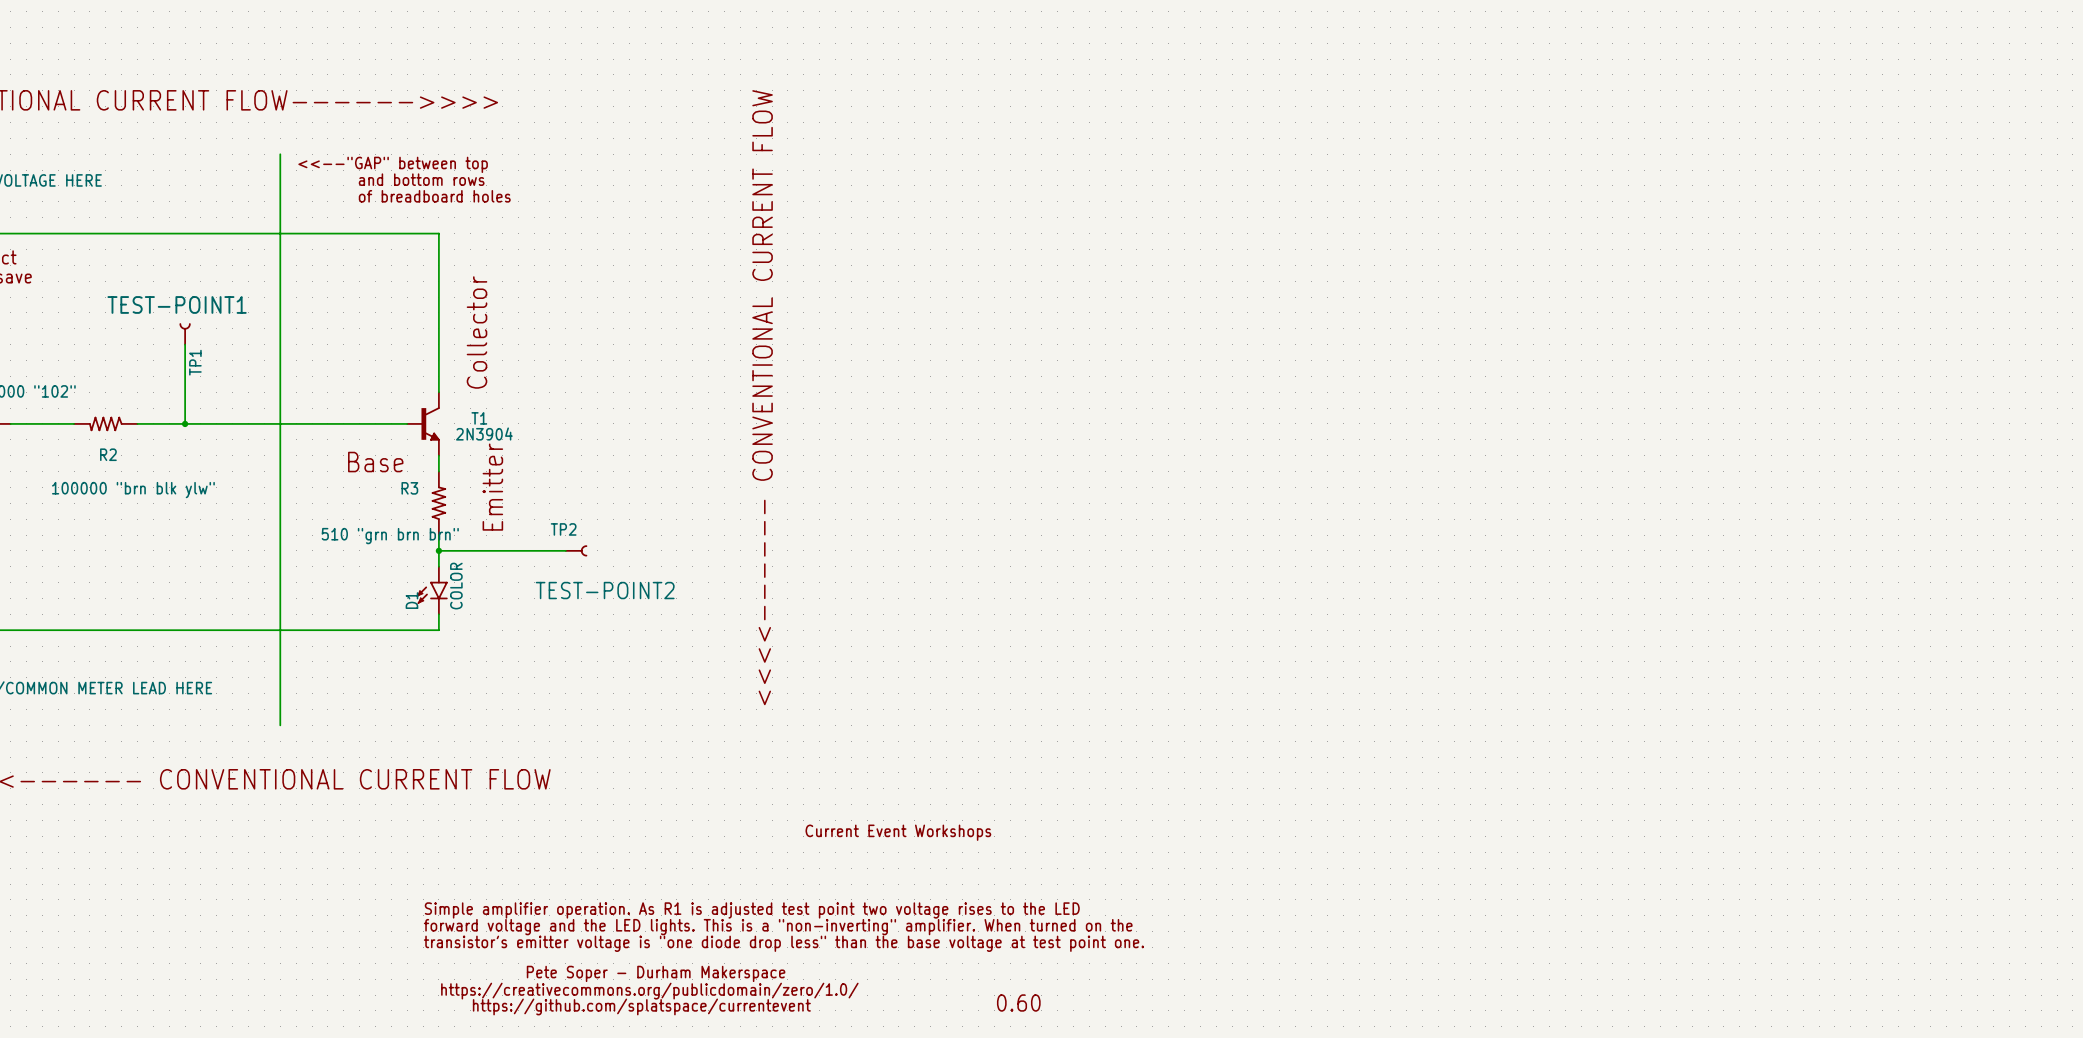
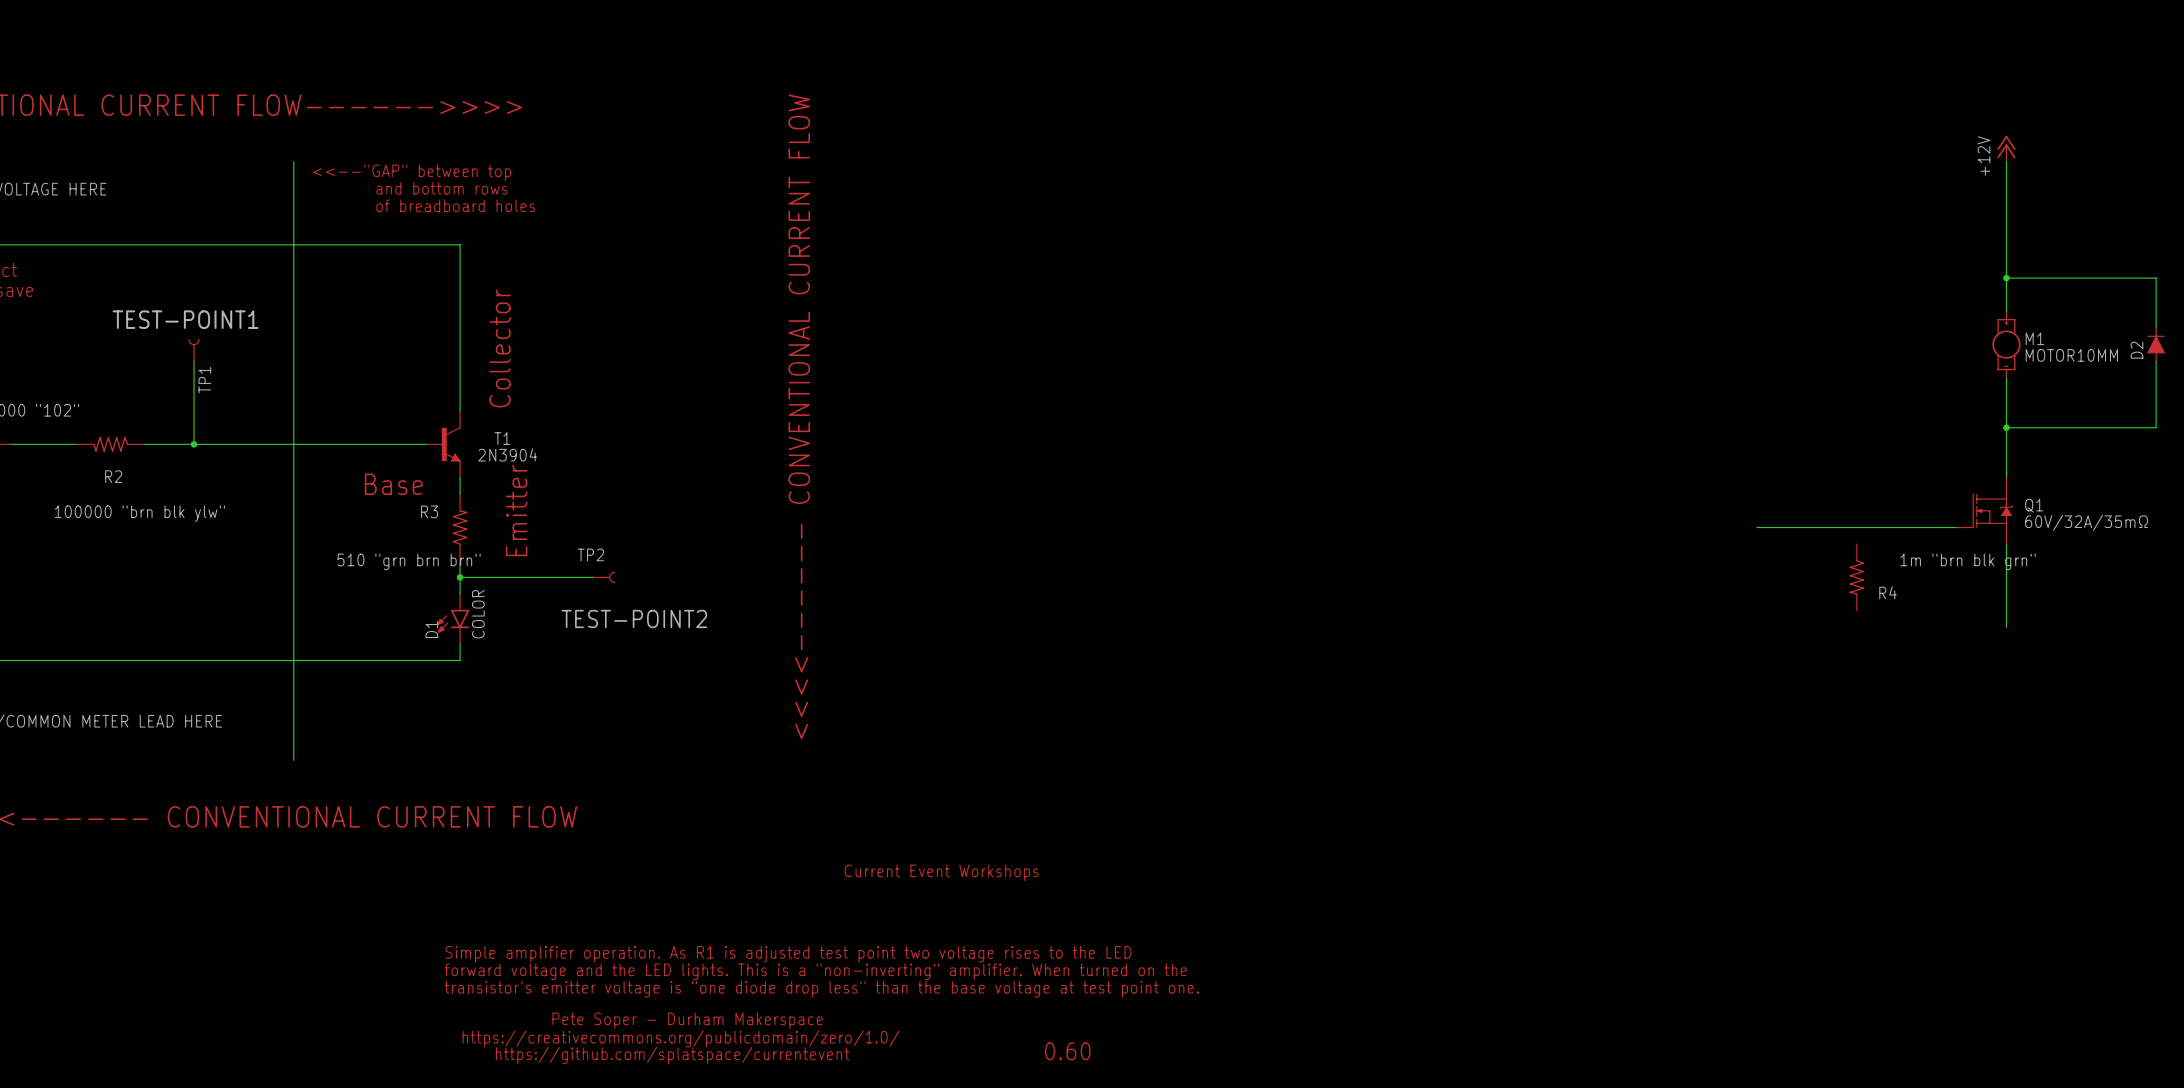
power symbol: none -> +12V (2006, 148)
wire: none -> (2006, 161) (2006, 311)
wire: none -> (2006, 278) (2156, 278) (2156, 327)
junction: none -> (2006, 278)
M1: none -> MOTOR10MM (2006, 344)
D2: none -> (2156, 344)
wire: none -> (2156, 361) (2156, 427) (2006, 427)
wire: none -> (2006, 377) (2006, 477)
junction: none -> (2006, 427)
Q1: none -> 60V/32A/35mΩ (1984, 510)
wire: none -> (1757, 527) (1956, 527)
wire: none -> (2006, 544) (2006, 627)
R4: none -> 1m "brn blk grn" (1856, 577)

